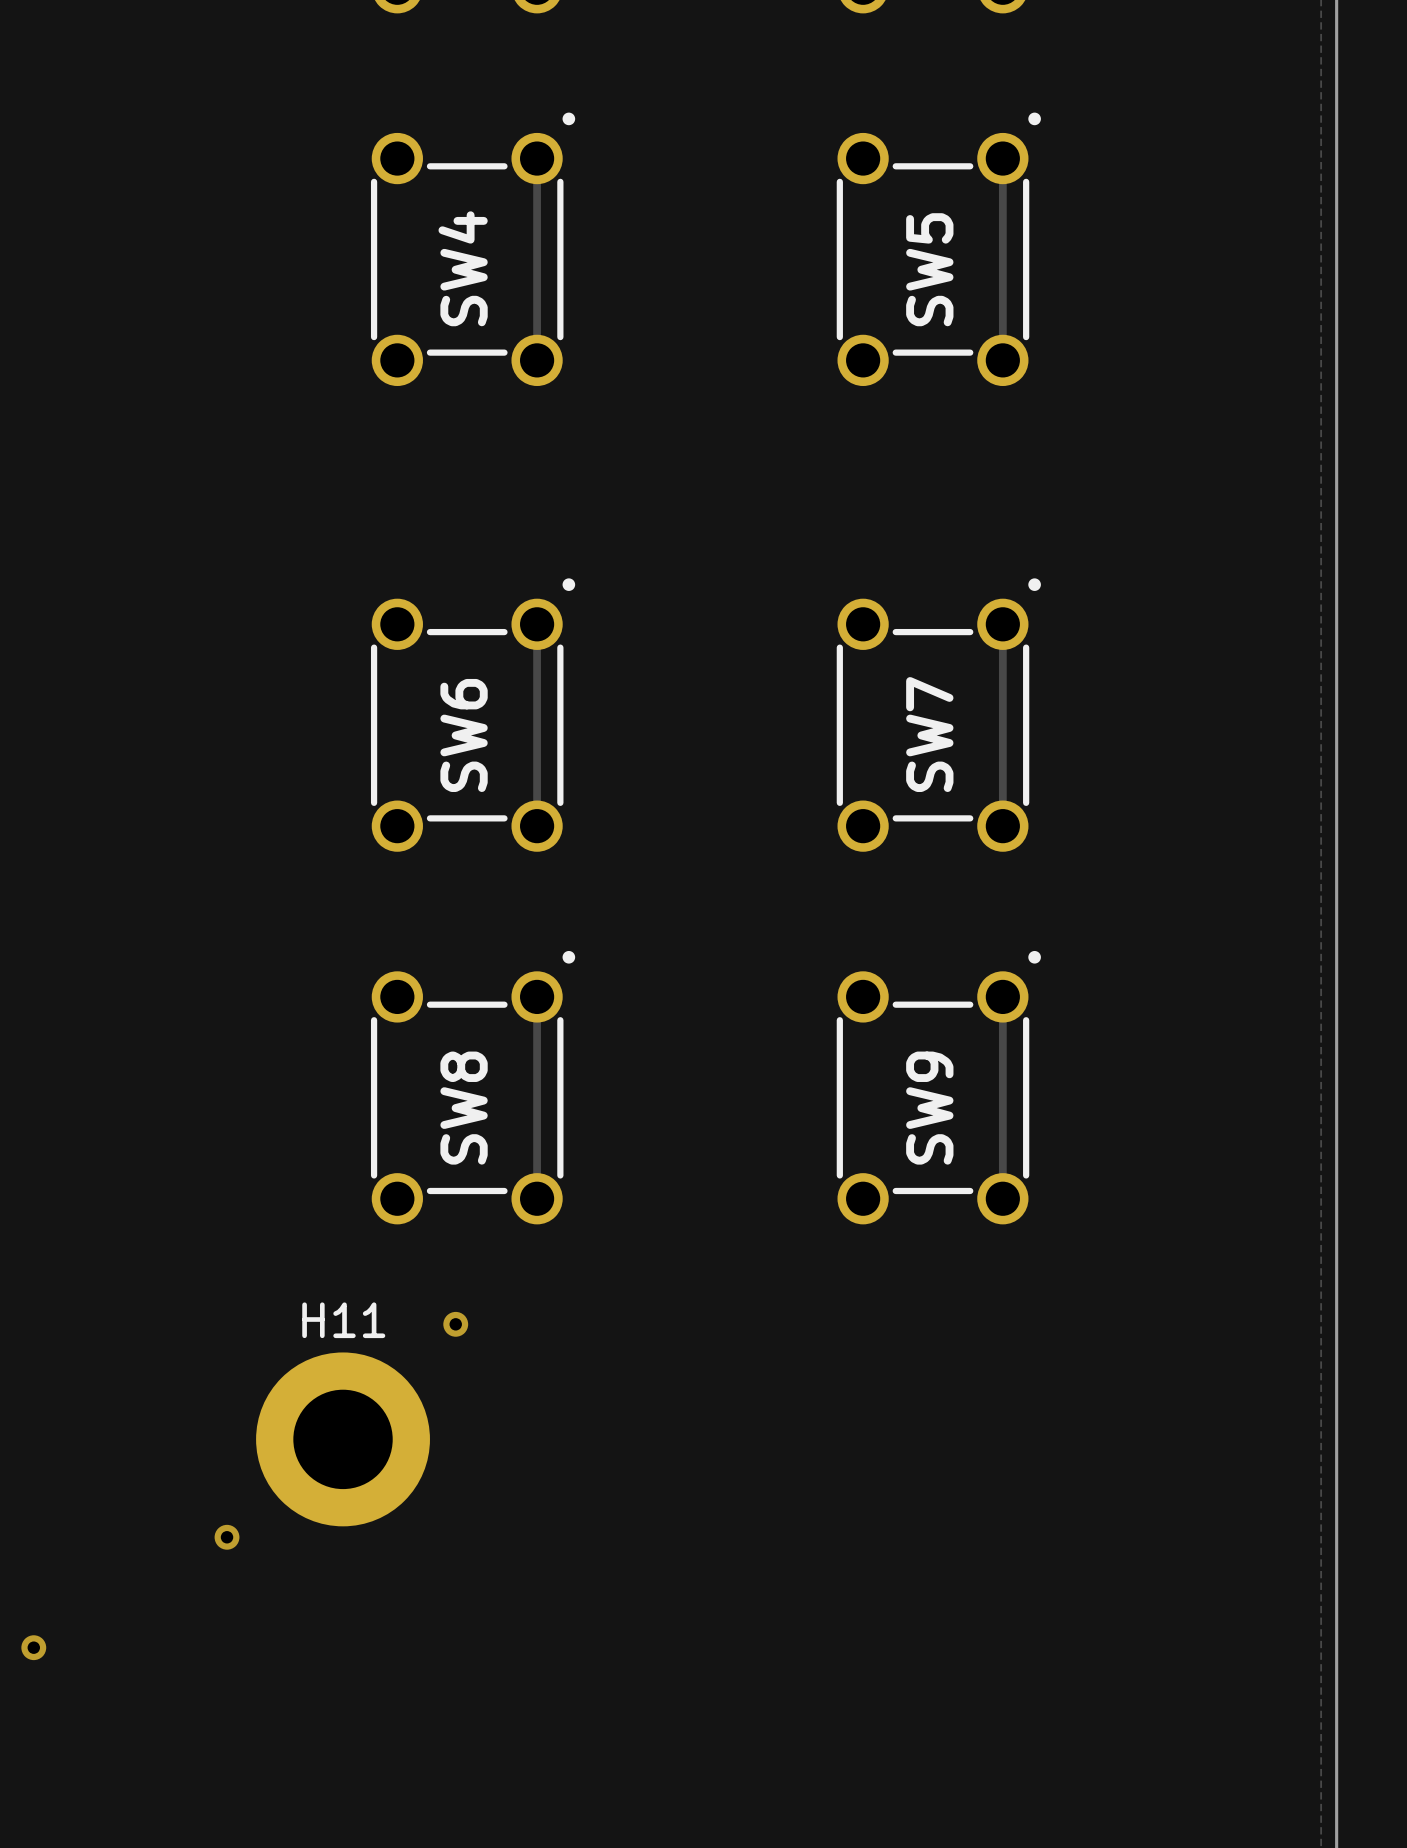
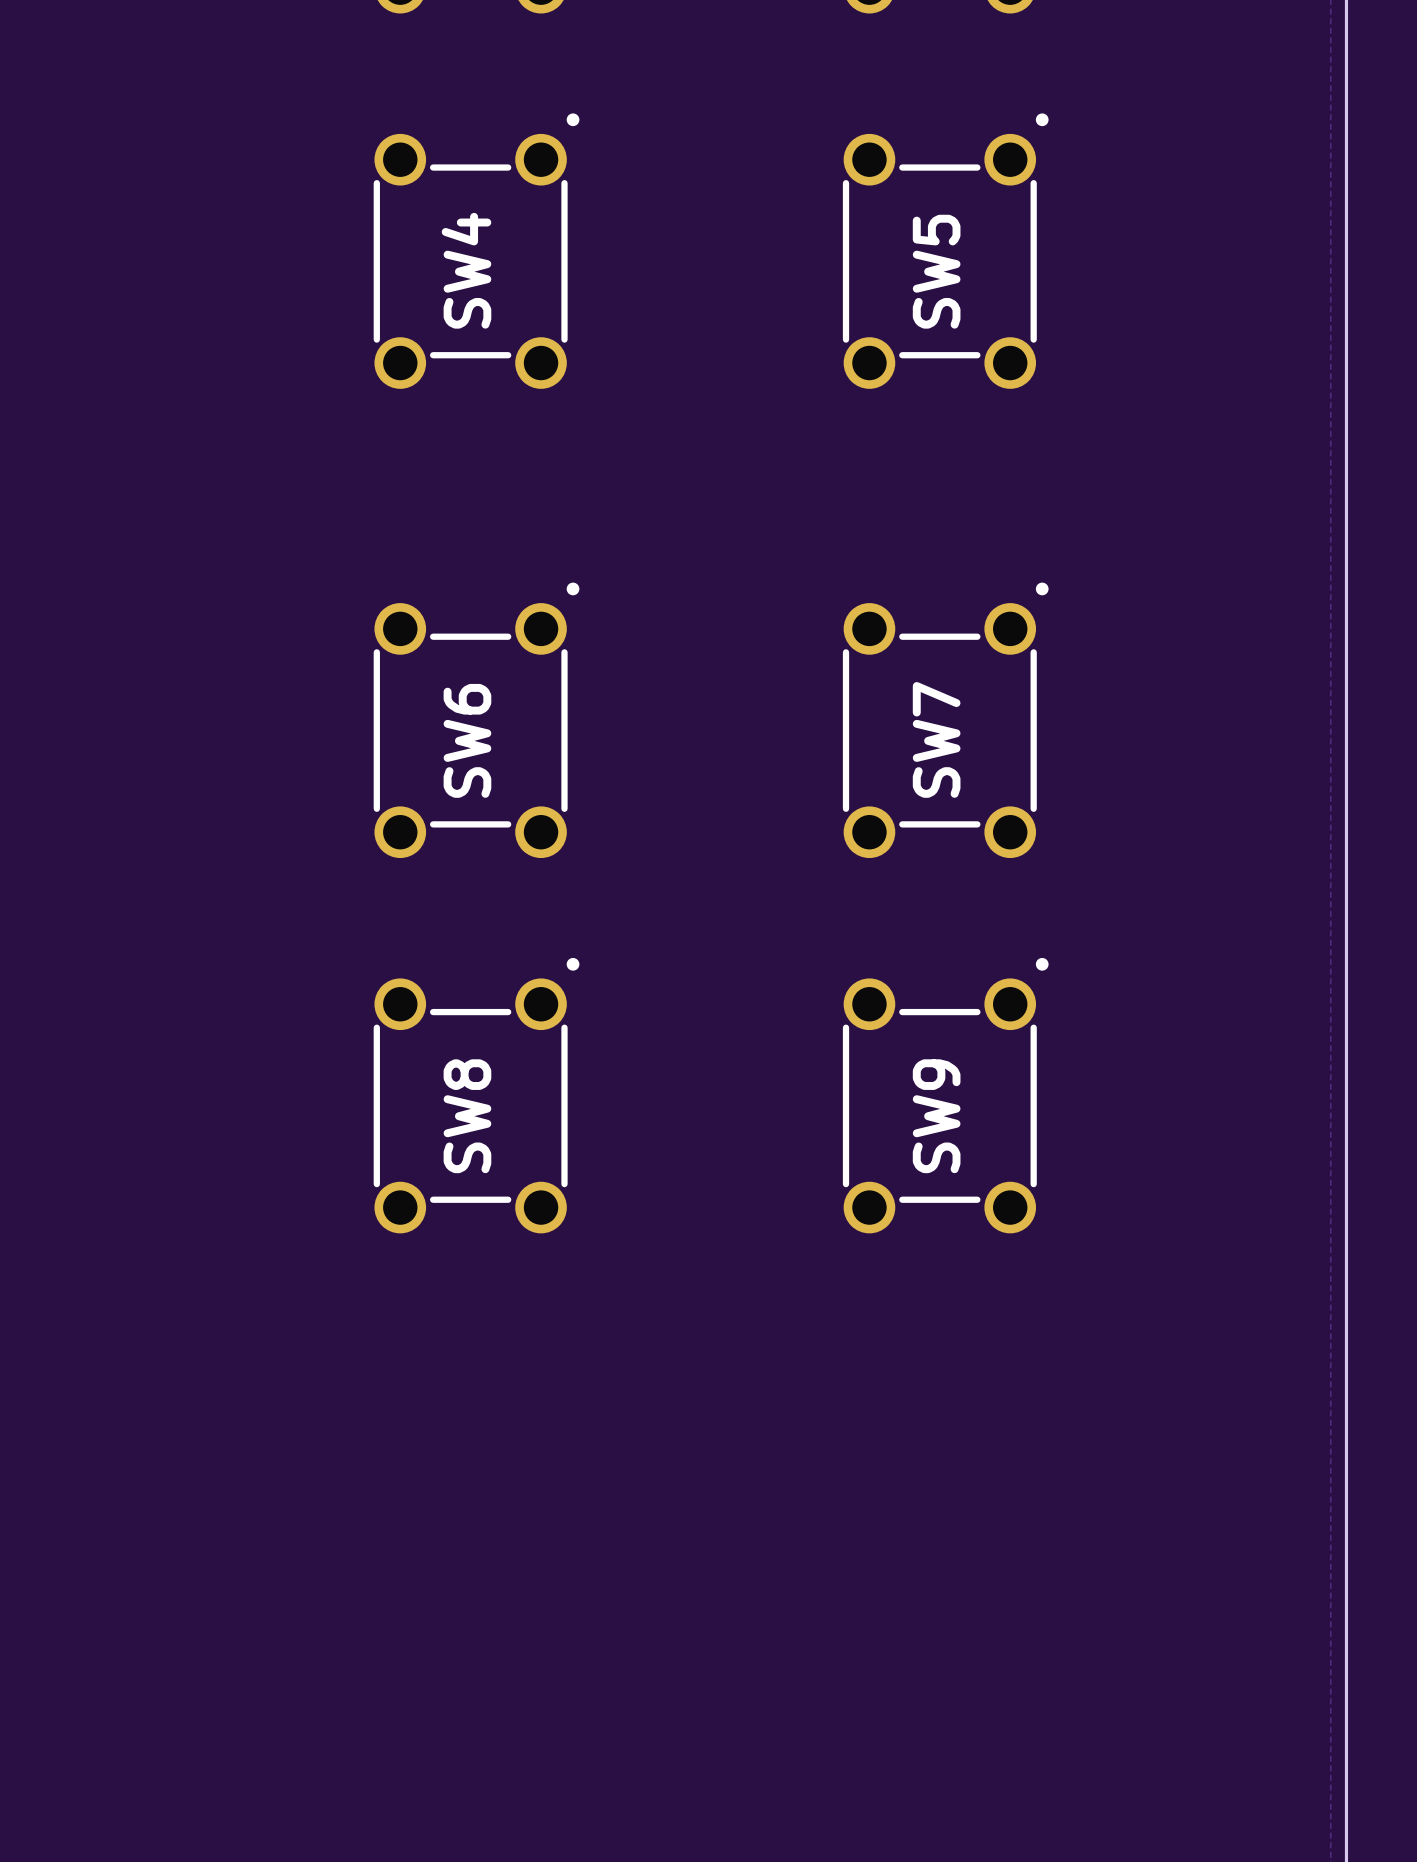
track: (537, 158) (537, 360) -> none
track: (1002, 158) (1002, 360) -> none
track: (537, 624) (537, 826) -> none
track: (1002, 624) (1002, 826) -> none
track: (537, 996) (537, 1198) -> none
track: (1002, 996) (1002, 1198) -> none
via: (455, 1324) -> none
H11: (343, 1439) -> none
via: (227, 1537) -> none
via: (33, 1647) -> none

